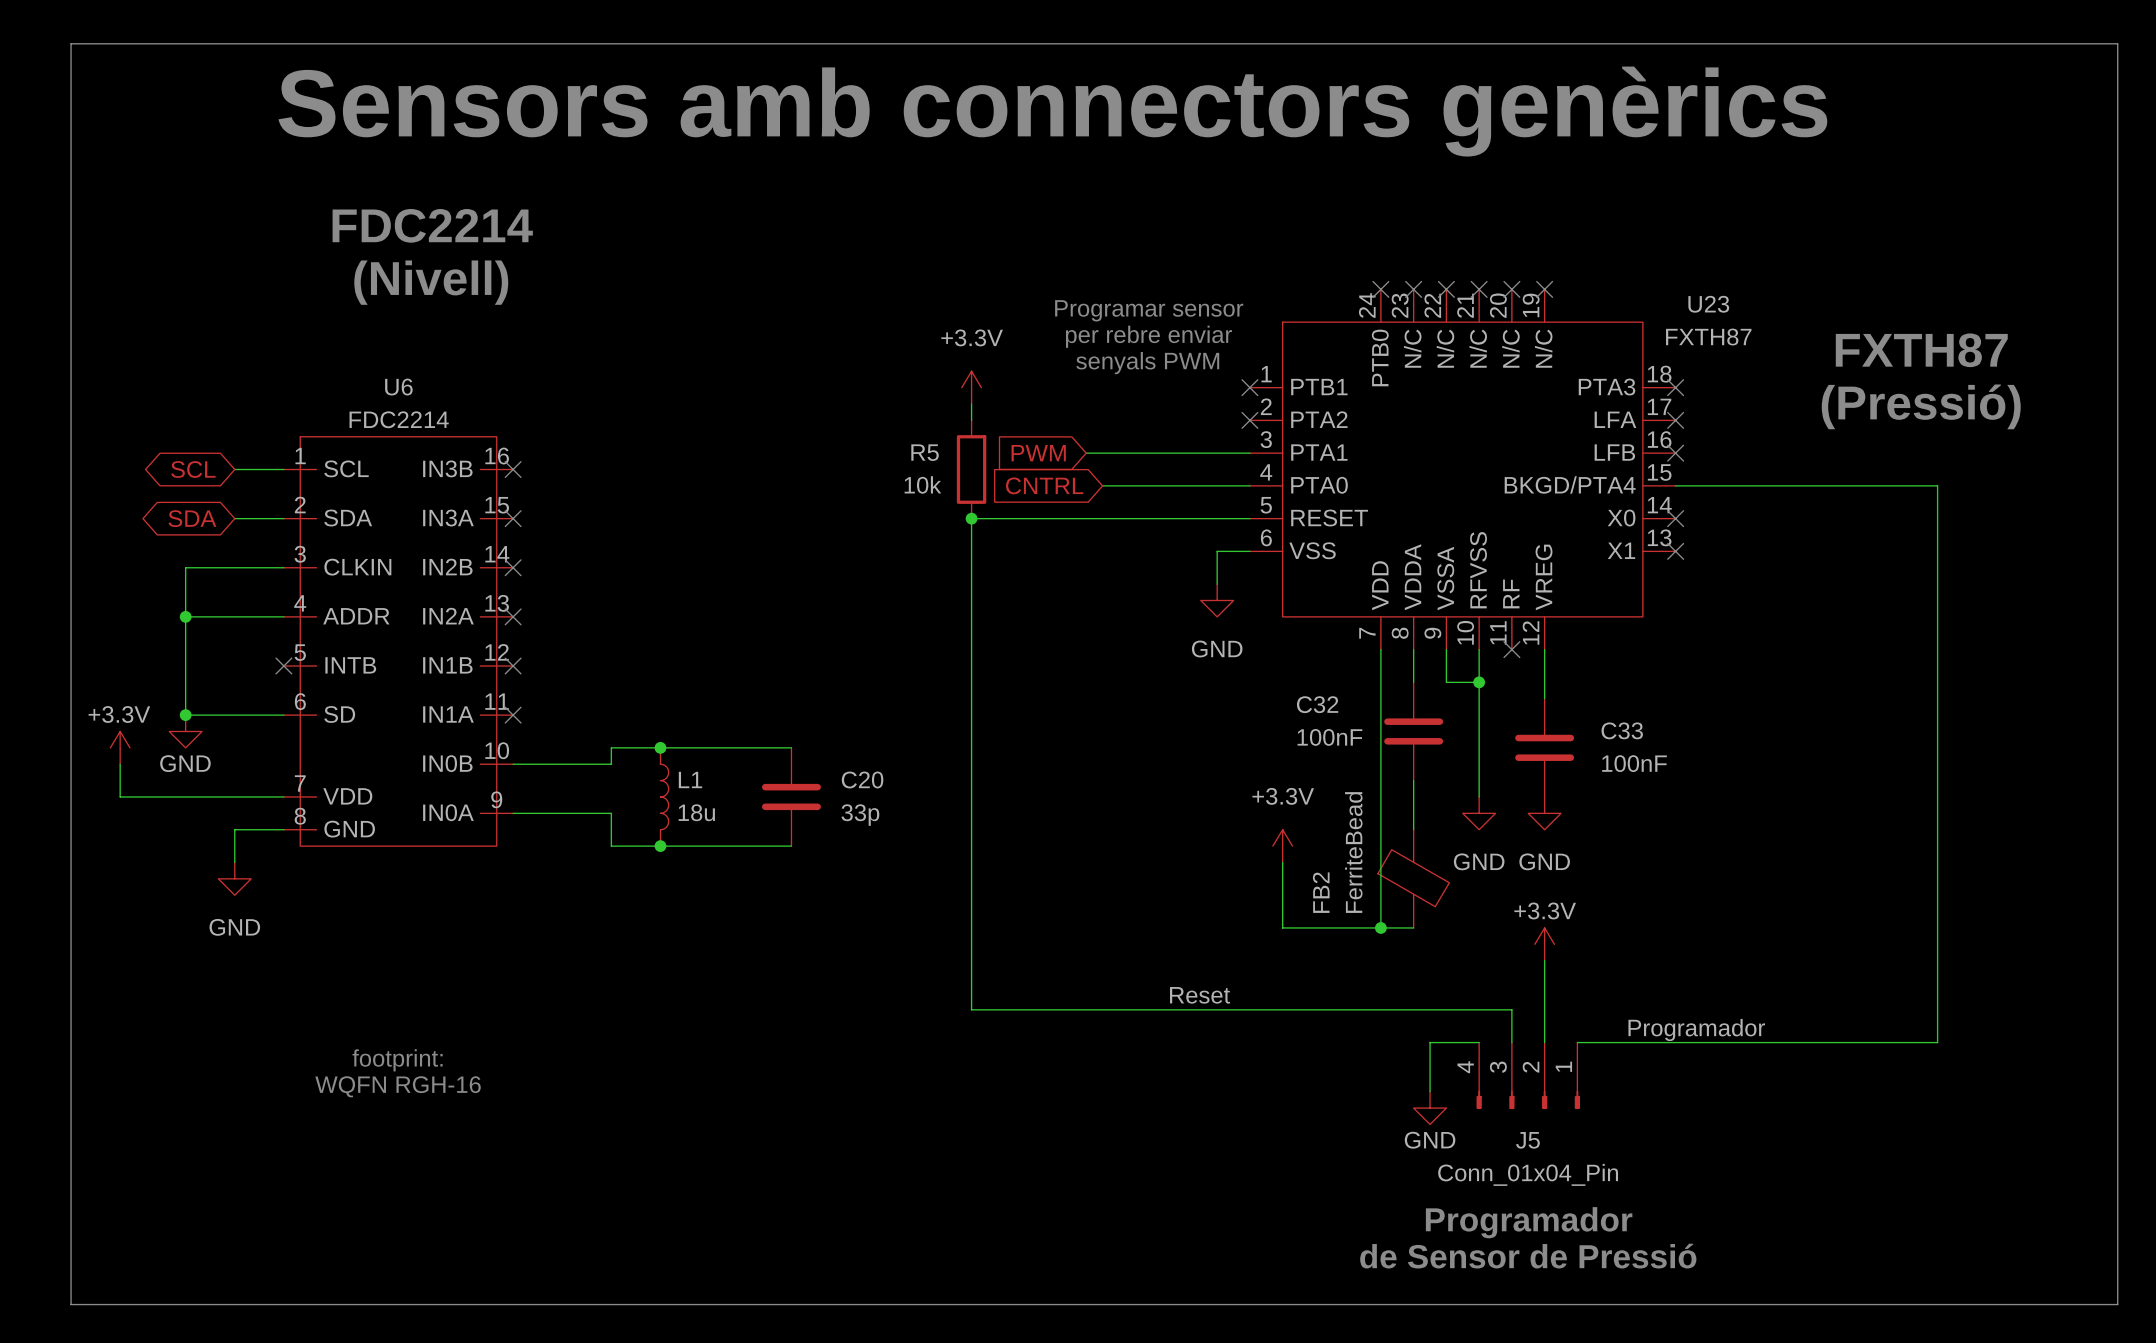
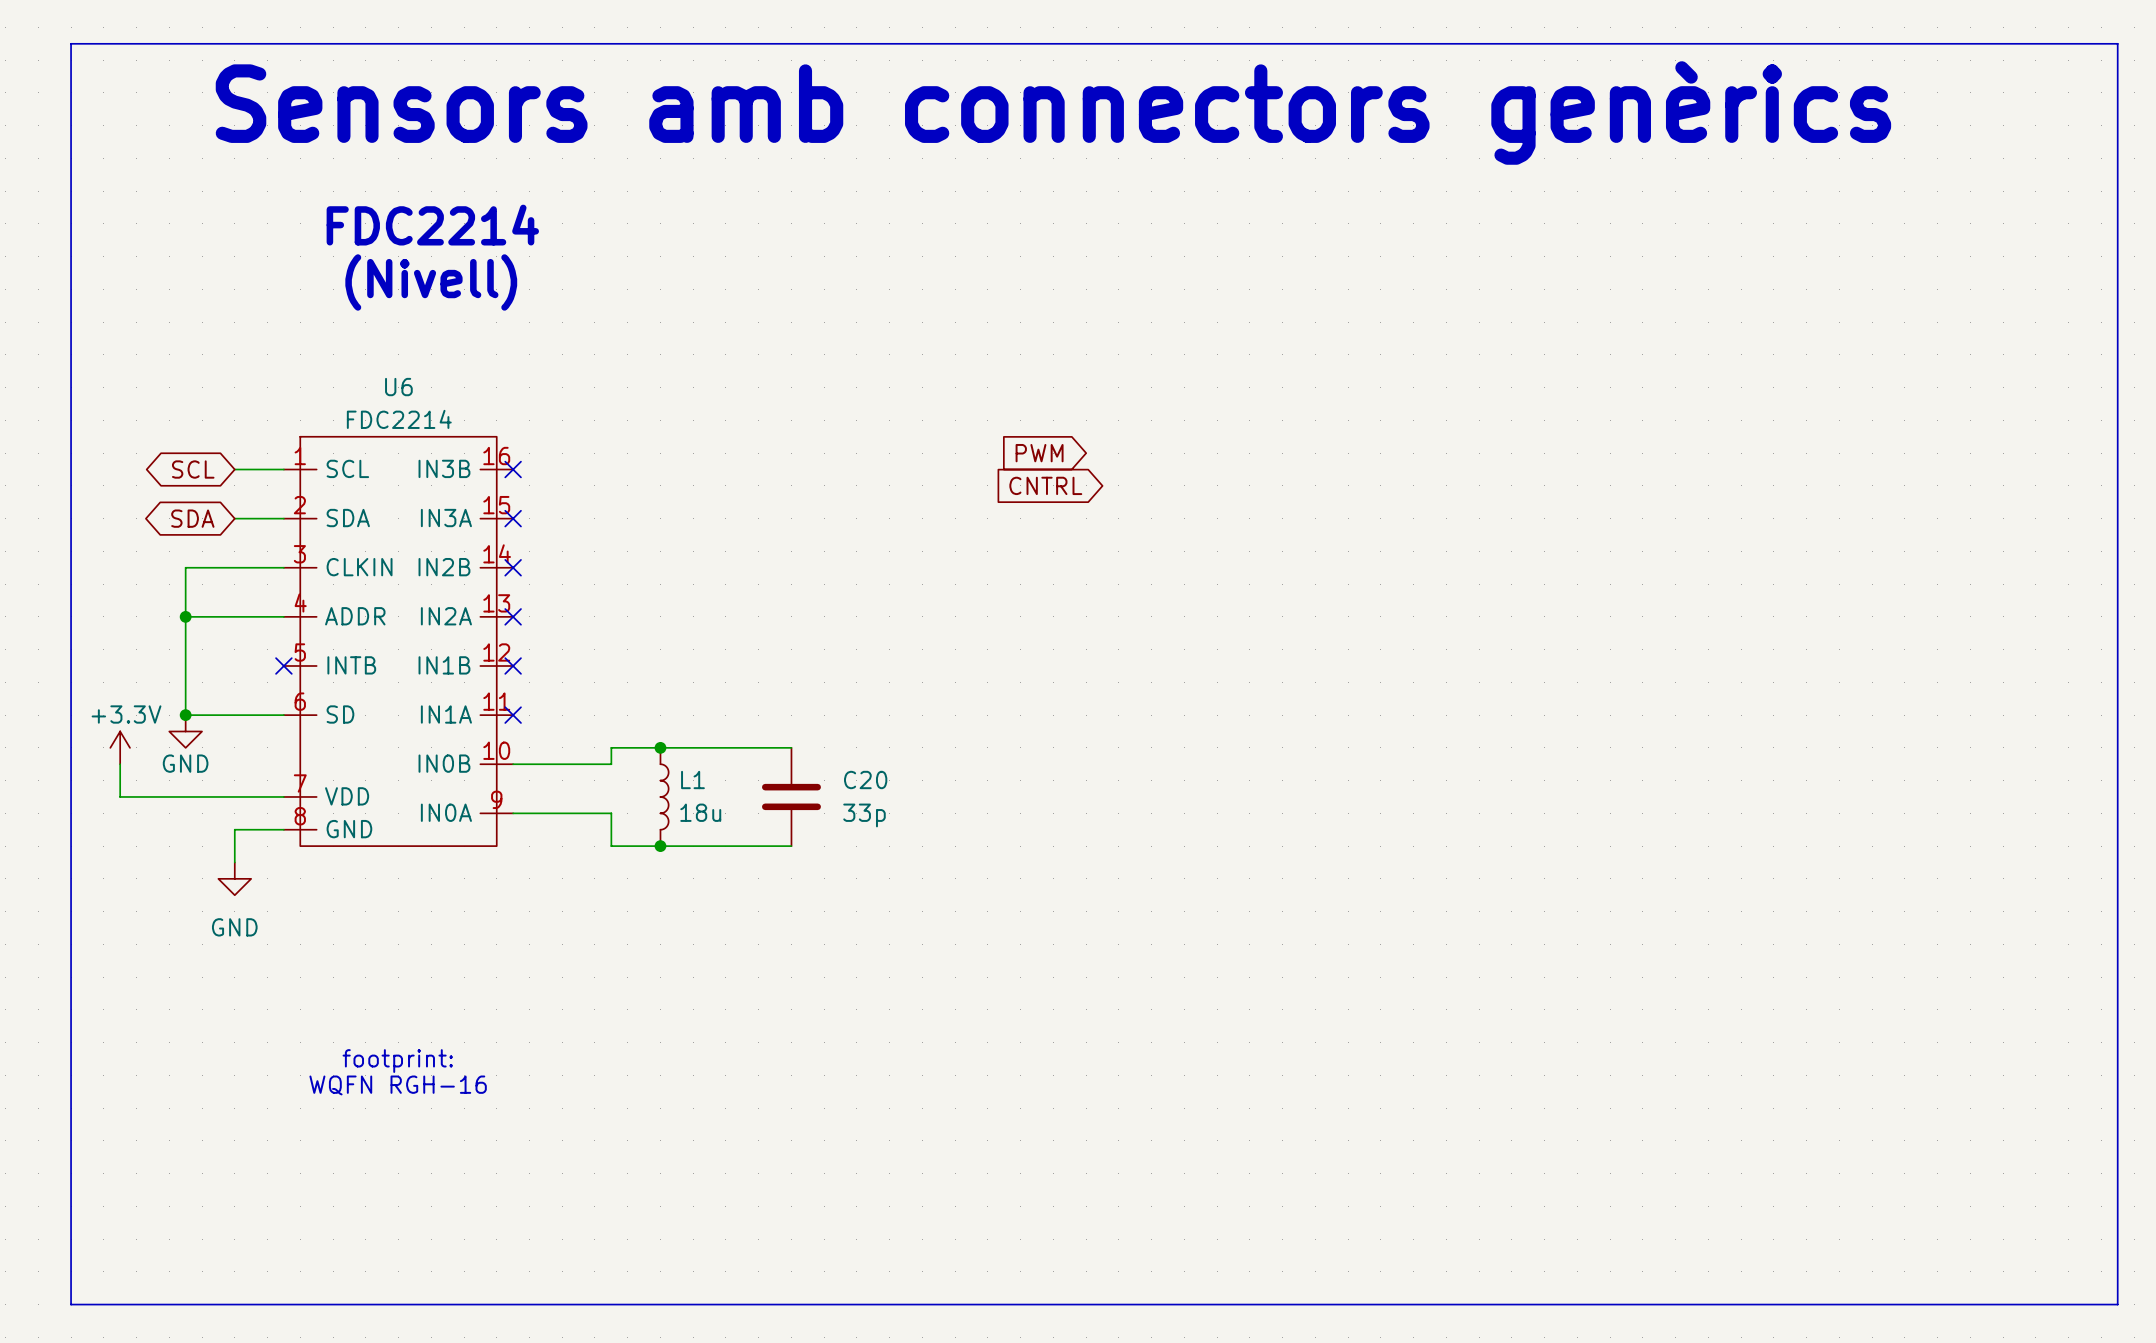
no-connect mark: (1380, 289) -> none
no-connect mark: (1413, 289) -> none
no-connect mark: (1446, 289) -> none
no-connect mark: (1479, 289) -> none
no-connect mark: (1511, 289) -> none
no-connect mark: (1544, 289) -> none
text: Programar sensor (1149, 310) -> none
text: per rebre enviar (1148, 336) -> none
text: FXTH87 (1921, 350) -> none
text: senyals PWM (1147, 363) -> none
power symbol: +3.3V (971, 387) -> none
no-connect mark: (1249, 387) -> none
no-connect mark: (1675, 387) -> none
wire: (971, 404) (971, 420) -> none
text: (Pressió) (1921, 406) -> none
no-connect mark: (1249, 420) -> none
no-connect mark: (1675, 420) -> none
wire: (1086, 453) (1249, 453) -> none
no-connect mark: (1675, 453) -> none
R5: 10k (971, 469) -> none
U23: FXTH87 (1462, 469) -> none
wire: (1102, 485) (1249, 485) -> none
wire: (1675, 485) (1937, 485) (1937, 1042) (1577, 1042) -> none
junction: (971, 518) -> none
wire: (1249, 518) (971, 518) (971, 1009) (1511, 1009) (1511, 1042) -> none
no-connect mark: (1675, 518) -> none
wire: (1249, 551) (1217, 551) (1217, 584) -> none
no-connect mark: (1675, 551) -> none
power symbol: GND (1217, 600) -> none
wire: (1380, 649) (1380, 927) -> none
wire: (1413, 649) (1413, 682) -> none
wire: (1446, 649) (1446, 682) (1479, 682) -> none
wire: (1479, 649) (1479, 796) -> none
no-connect mark: (1511, 649) -> none
wire: (1544, 649) (1544, 698) -> none
junction: (1479, 682) -> none
C32: 100nF (1413, 731) -> none
C33: 100nF (1544, 747) -> none
wire: (1413, 780) (1413, 829) -> none
power symbol: GND (1479, 813) -> none
power symbol: GND (1544, 813) -> none
power symbol: +3.3V (1282, 846) -> none
wire: (1282, 862) (1282, 927) (1413, 927) -> none
FB2: FerriteBead (1413, 878) -> none
junction: (1380, 927) -> none
power symbol: +3.3V (1544, 944) -> none
wire: (1544, 960) (1544, 1042) -> none
label: Reset (1200, 995) -> none
label: Programador (1696, 1030) -> none
wire: (1479, 1042) (1430, 1042) (1430, 1091) -> none
J5: Conn_01x04_Pin (1528, 1075) -> none
power symbol: GND (1430, 1108) -> none
text: Programador (1529, 1222) -> none
text: de Sensor de Pressió (1528, 1256) -> none

